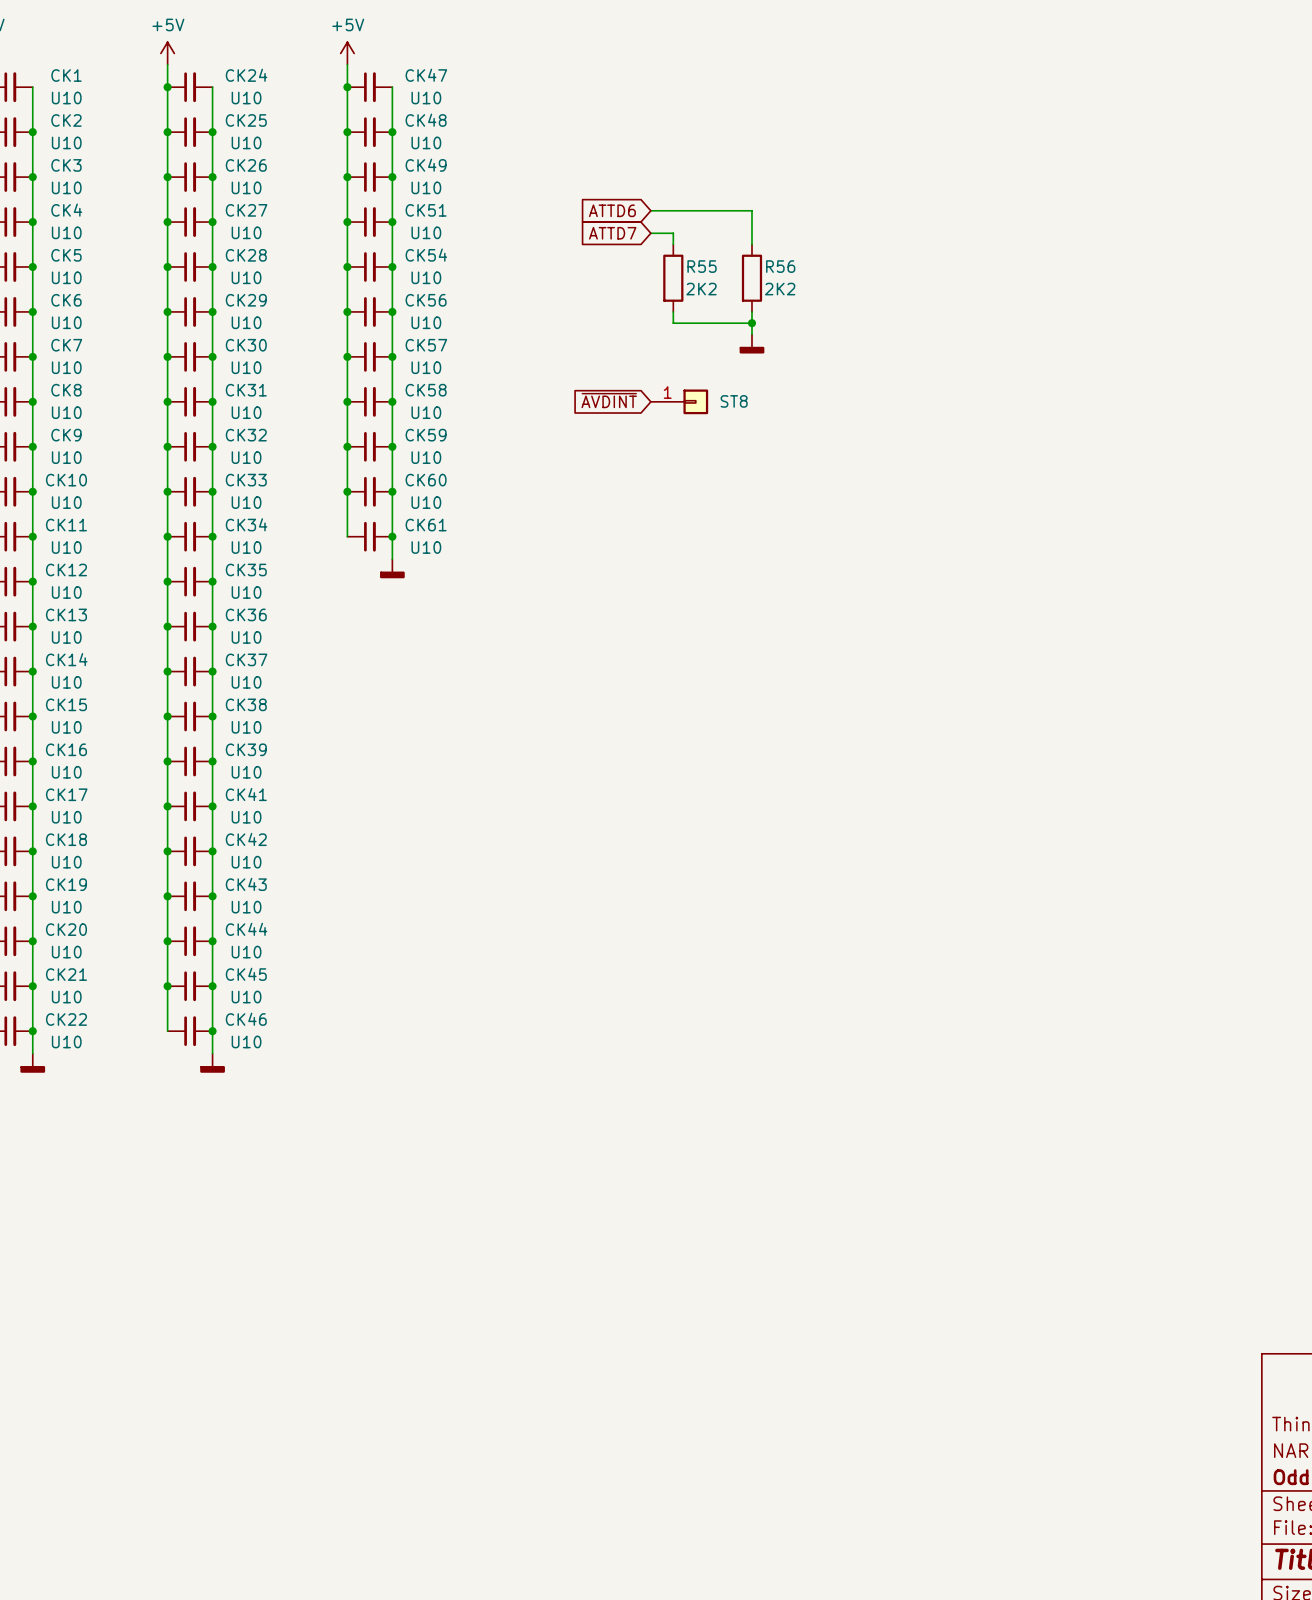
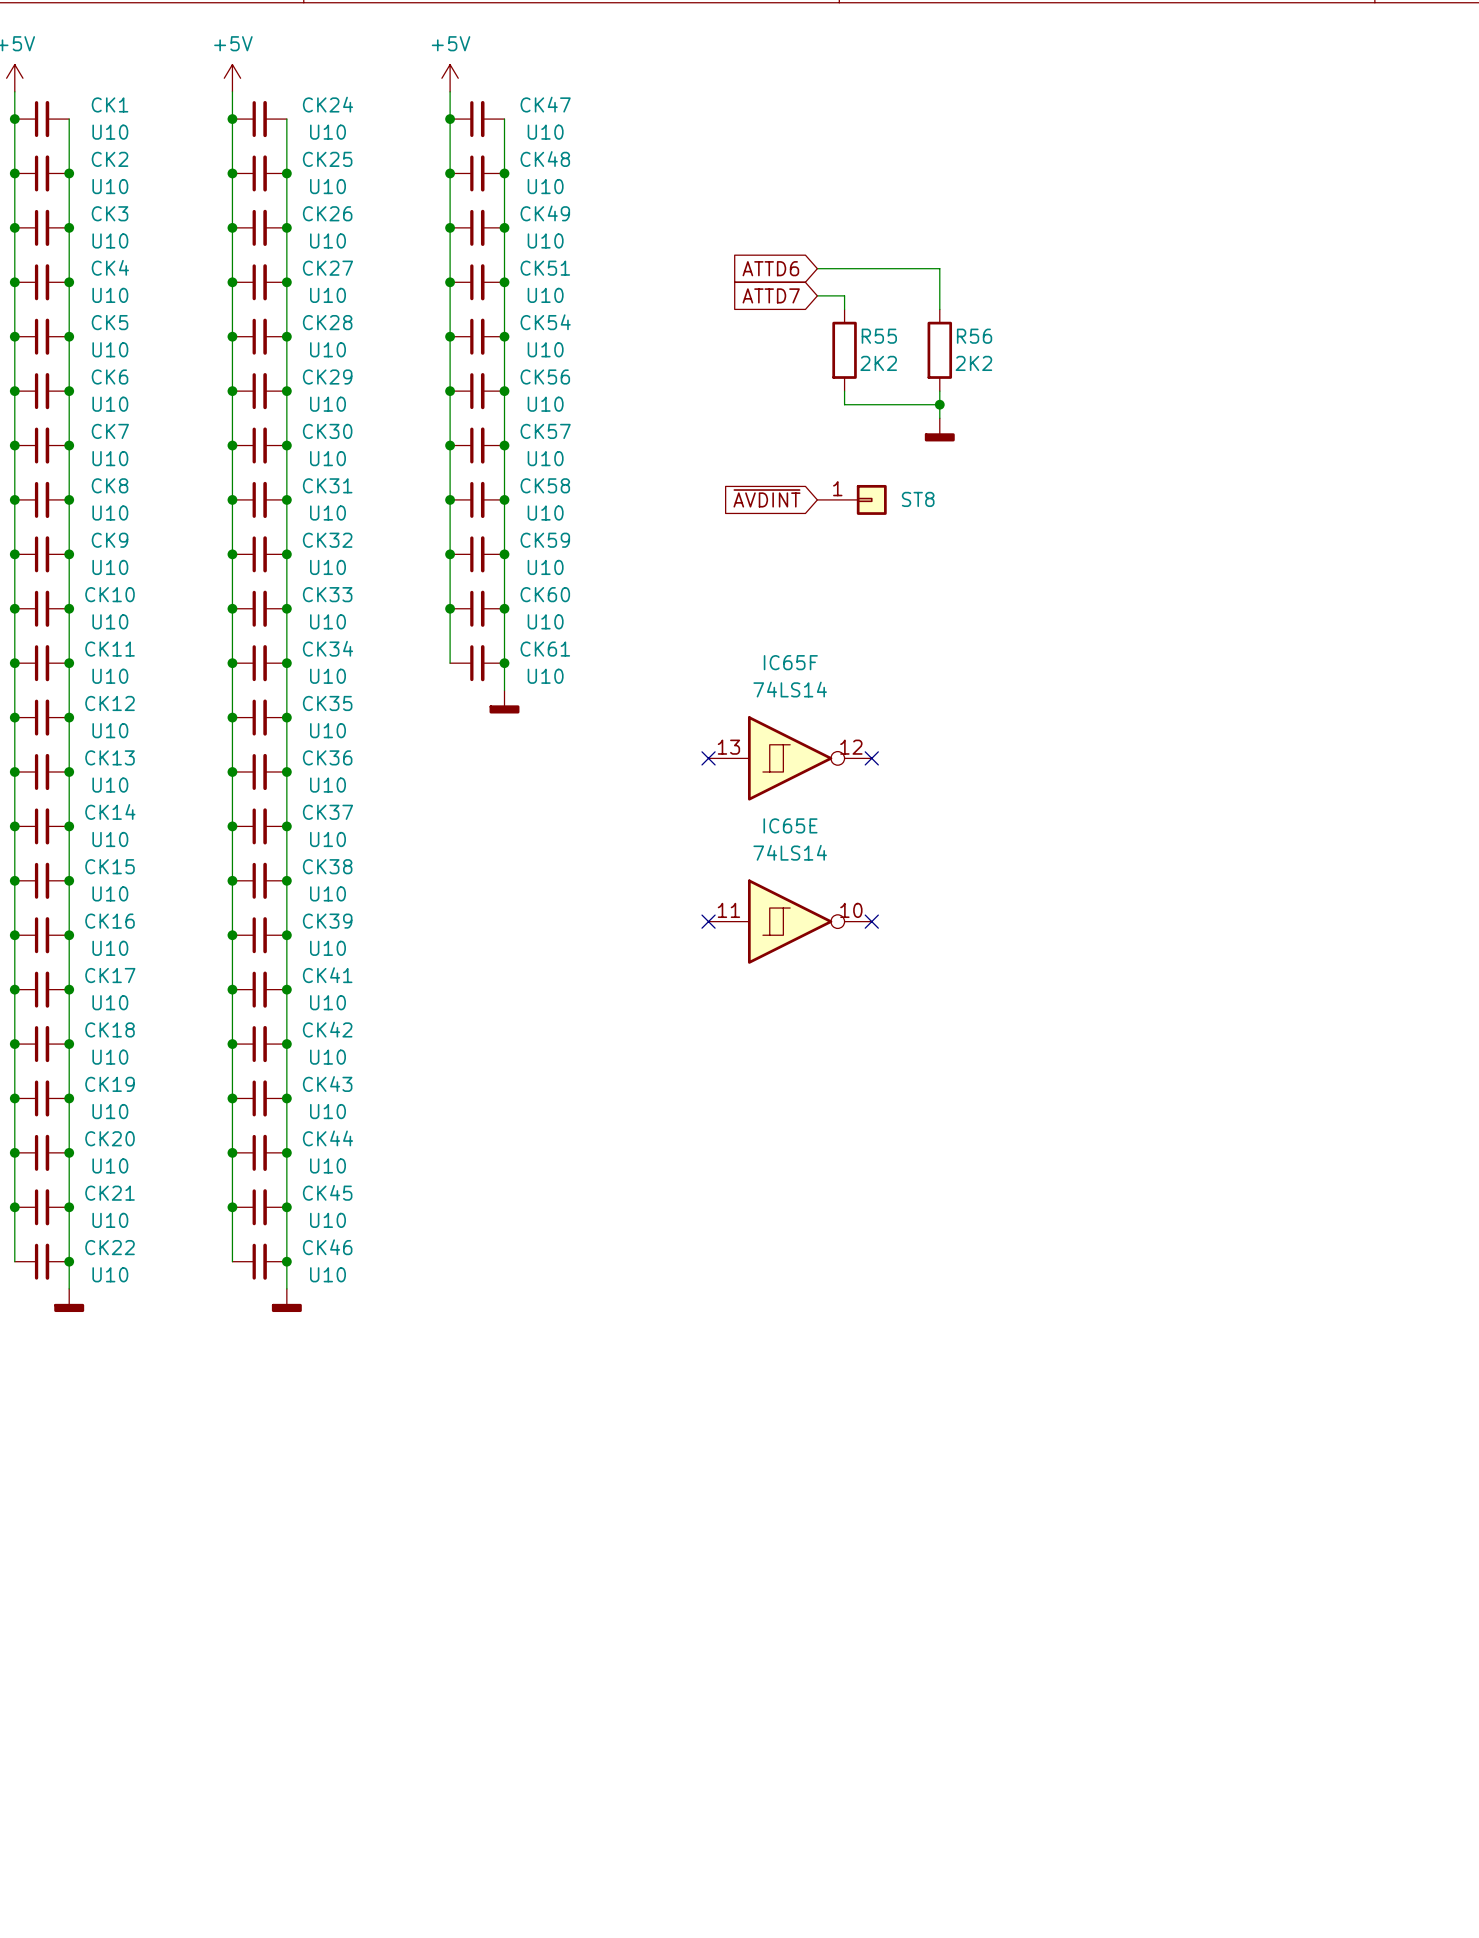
no-connect mark: none -> (708, 758)
IC65F: none -> 74LS14 (790, 758)
no-connect mark: none -> (871, 758)
no-connect mark: none -> (708, 921)
IC65E: none -> 74LS14 (790, 921)
no-connect mark: none -> (871, 921)

